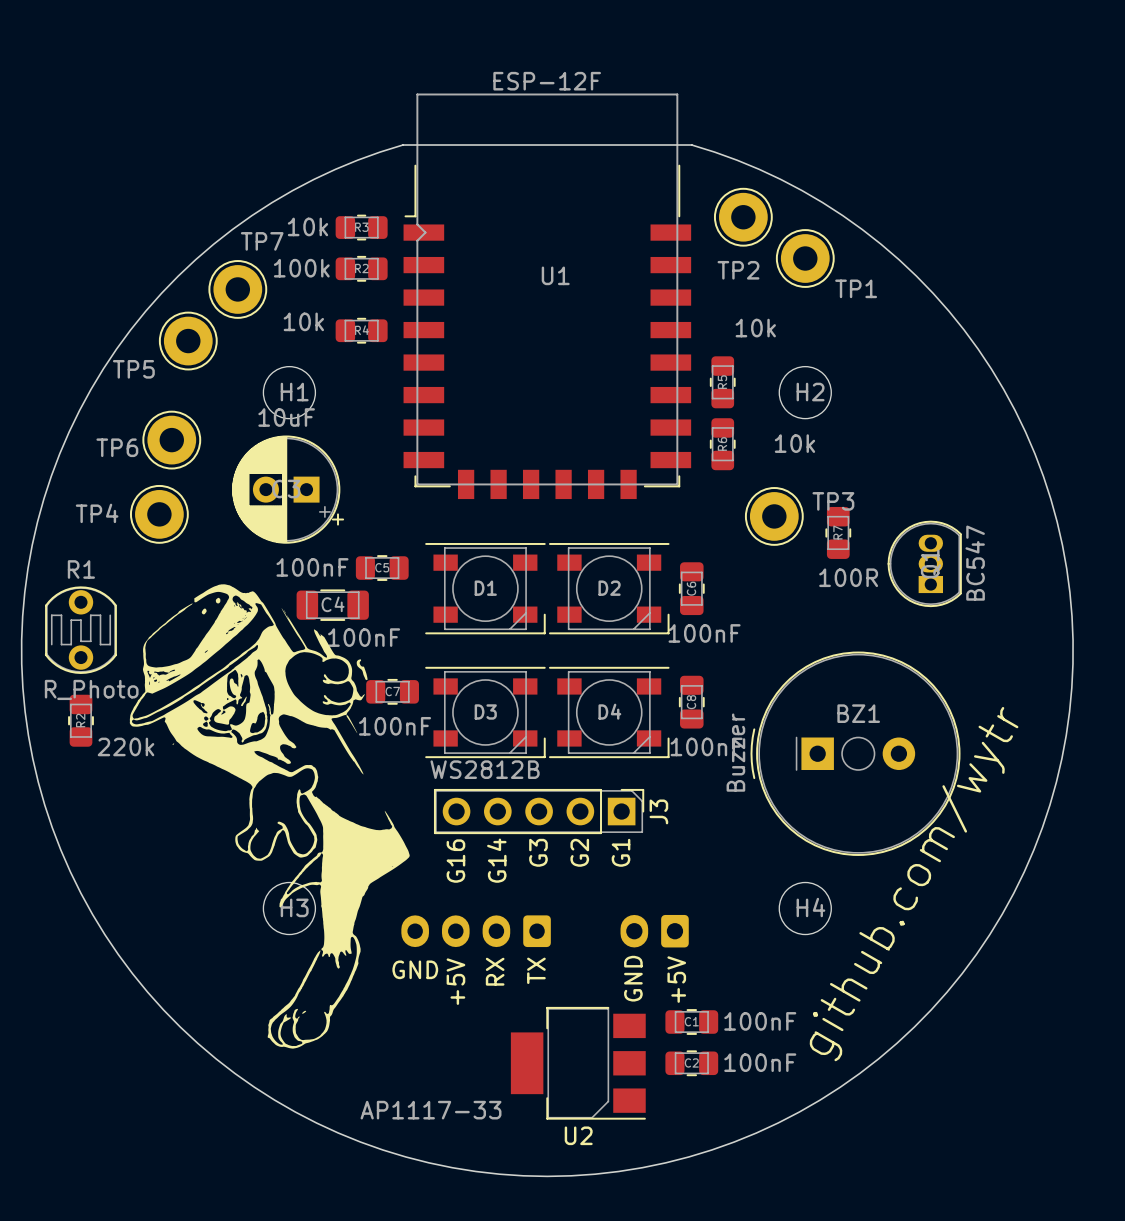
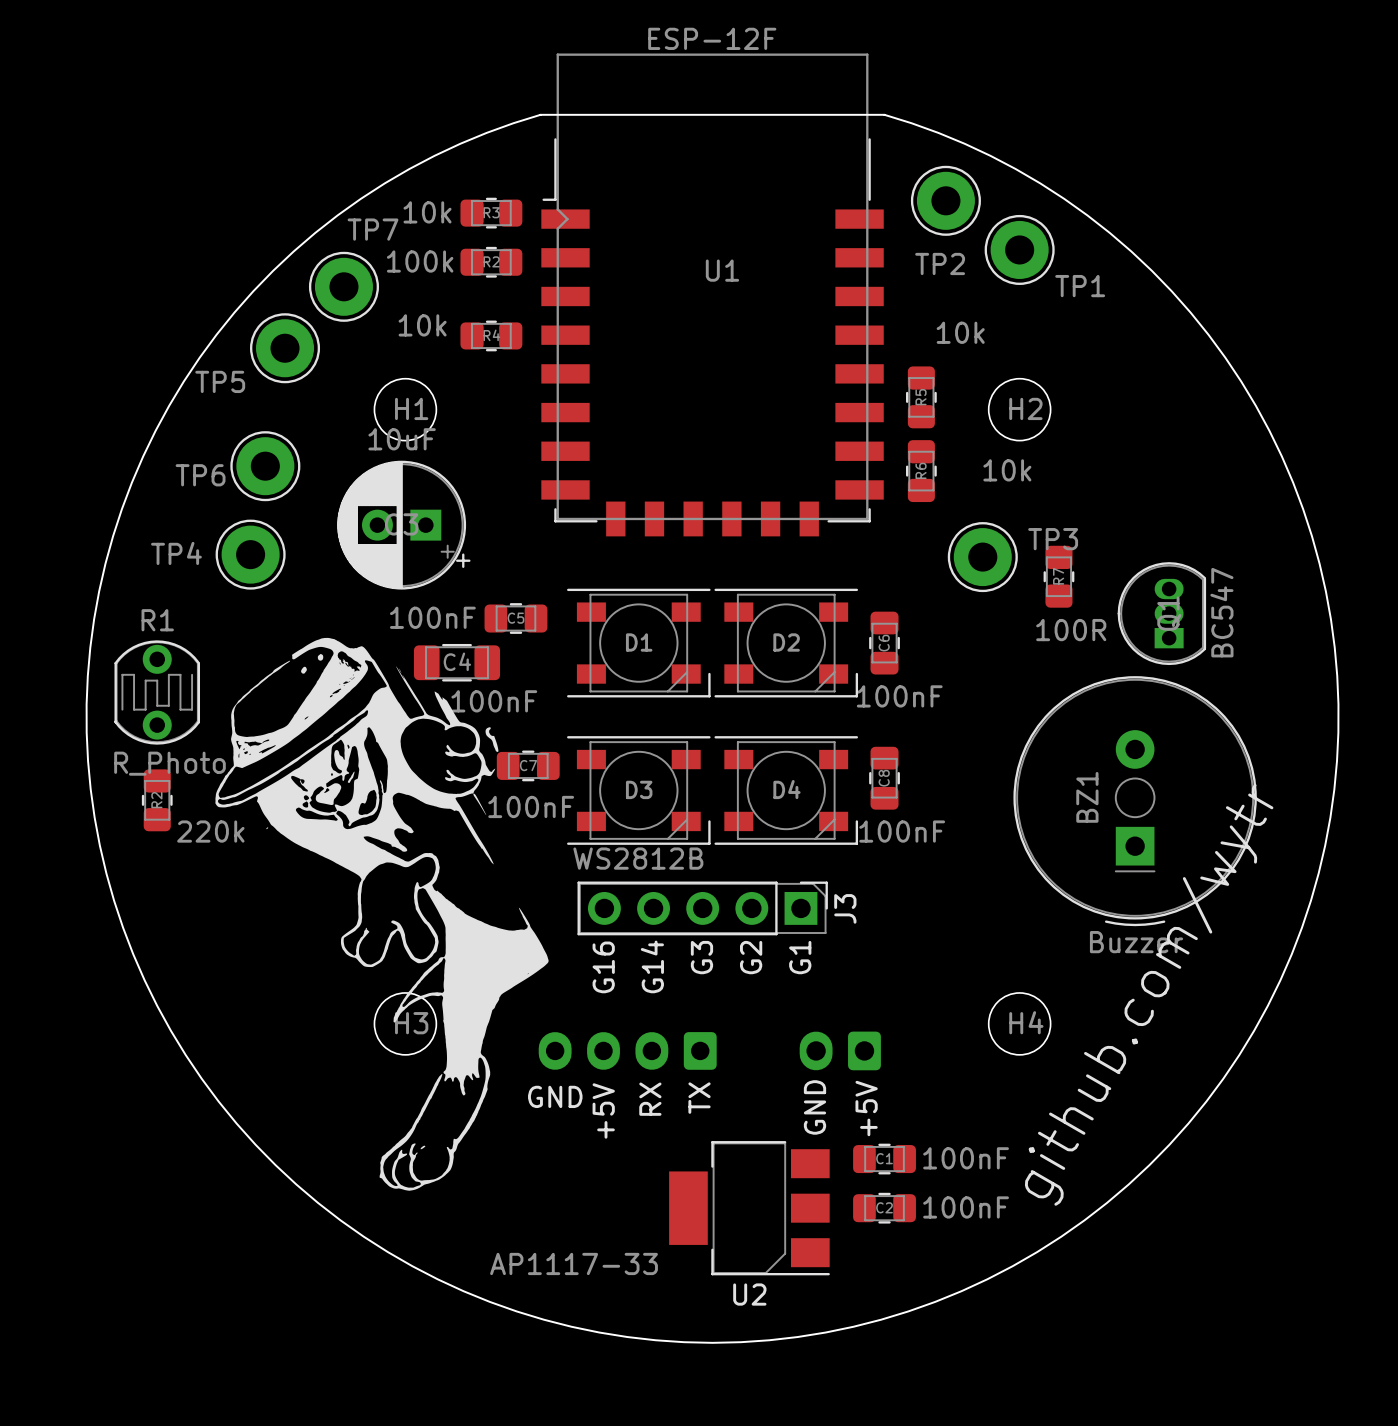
BZ1 rotation: 0° (855, 753) -> 90° counterclockwise (1135, 801)

